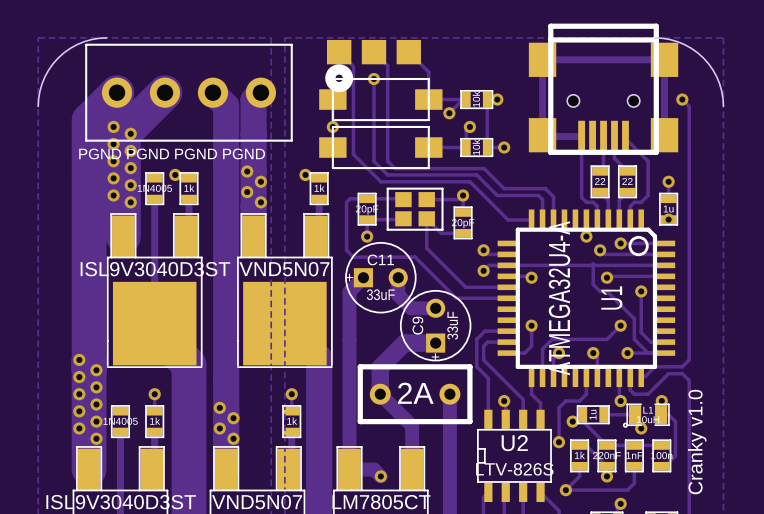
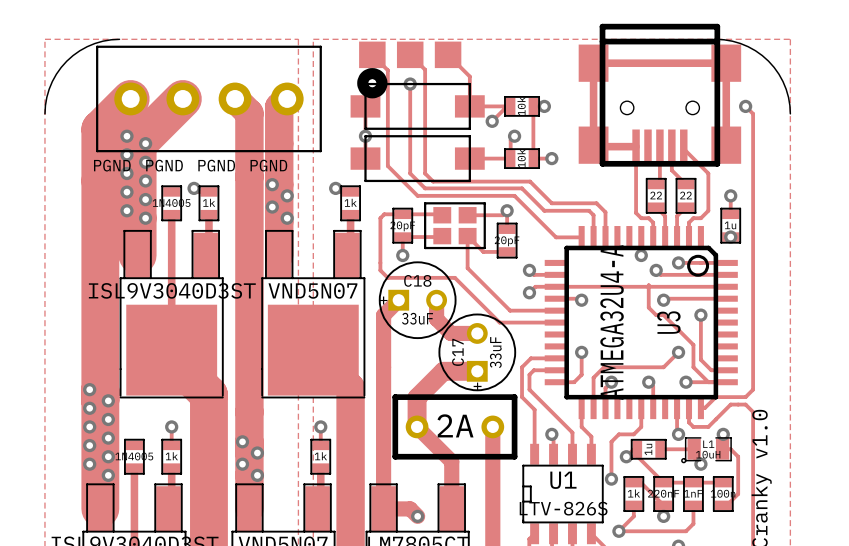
C11 name: C11 (380, 259) -> C18 (417, 280)
U1 name: U1 (611, 297) -> U3 (668, 322)
C9 name: C9 (417, 325) -> C17 (457, 352)
U2 name: U2 (514, 443) -> U1 (563, 480)

